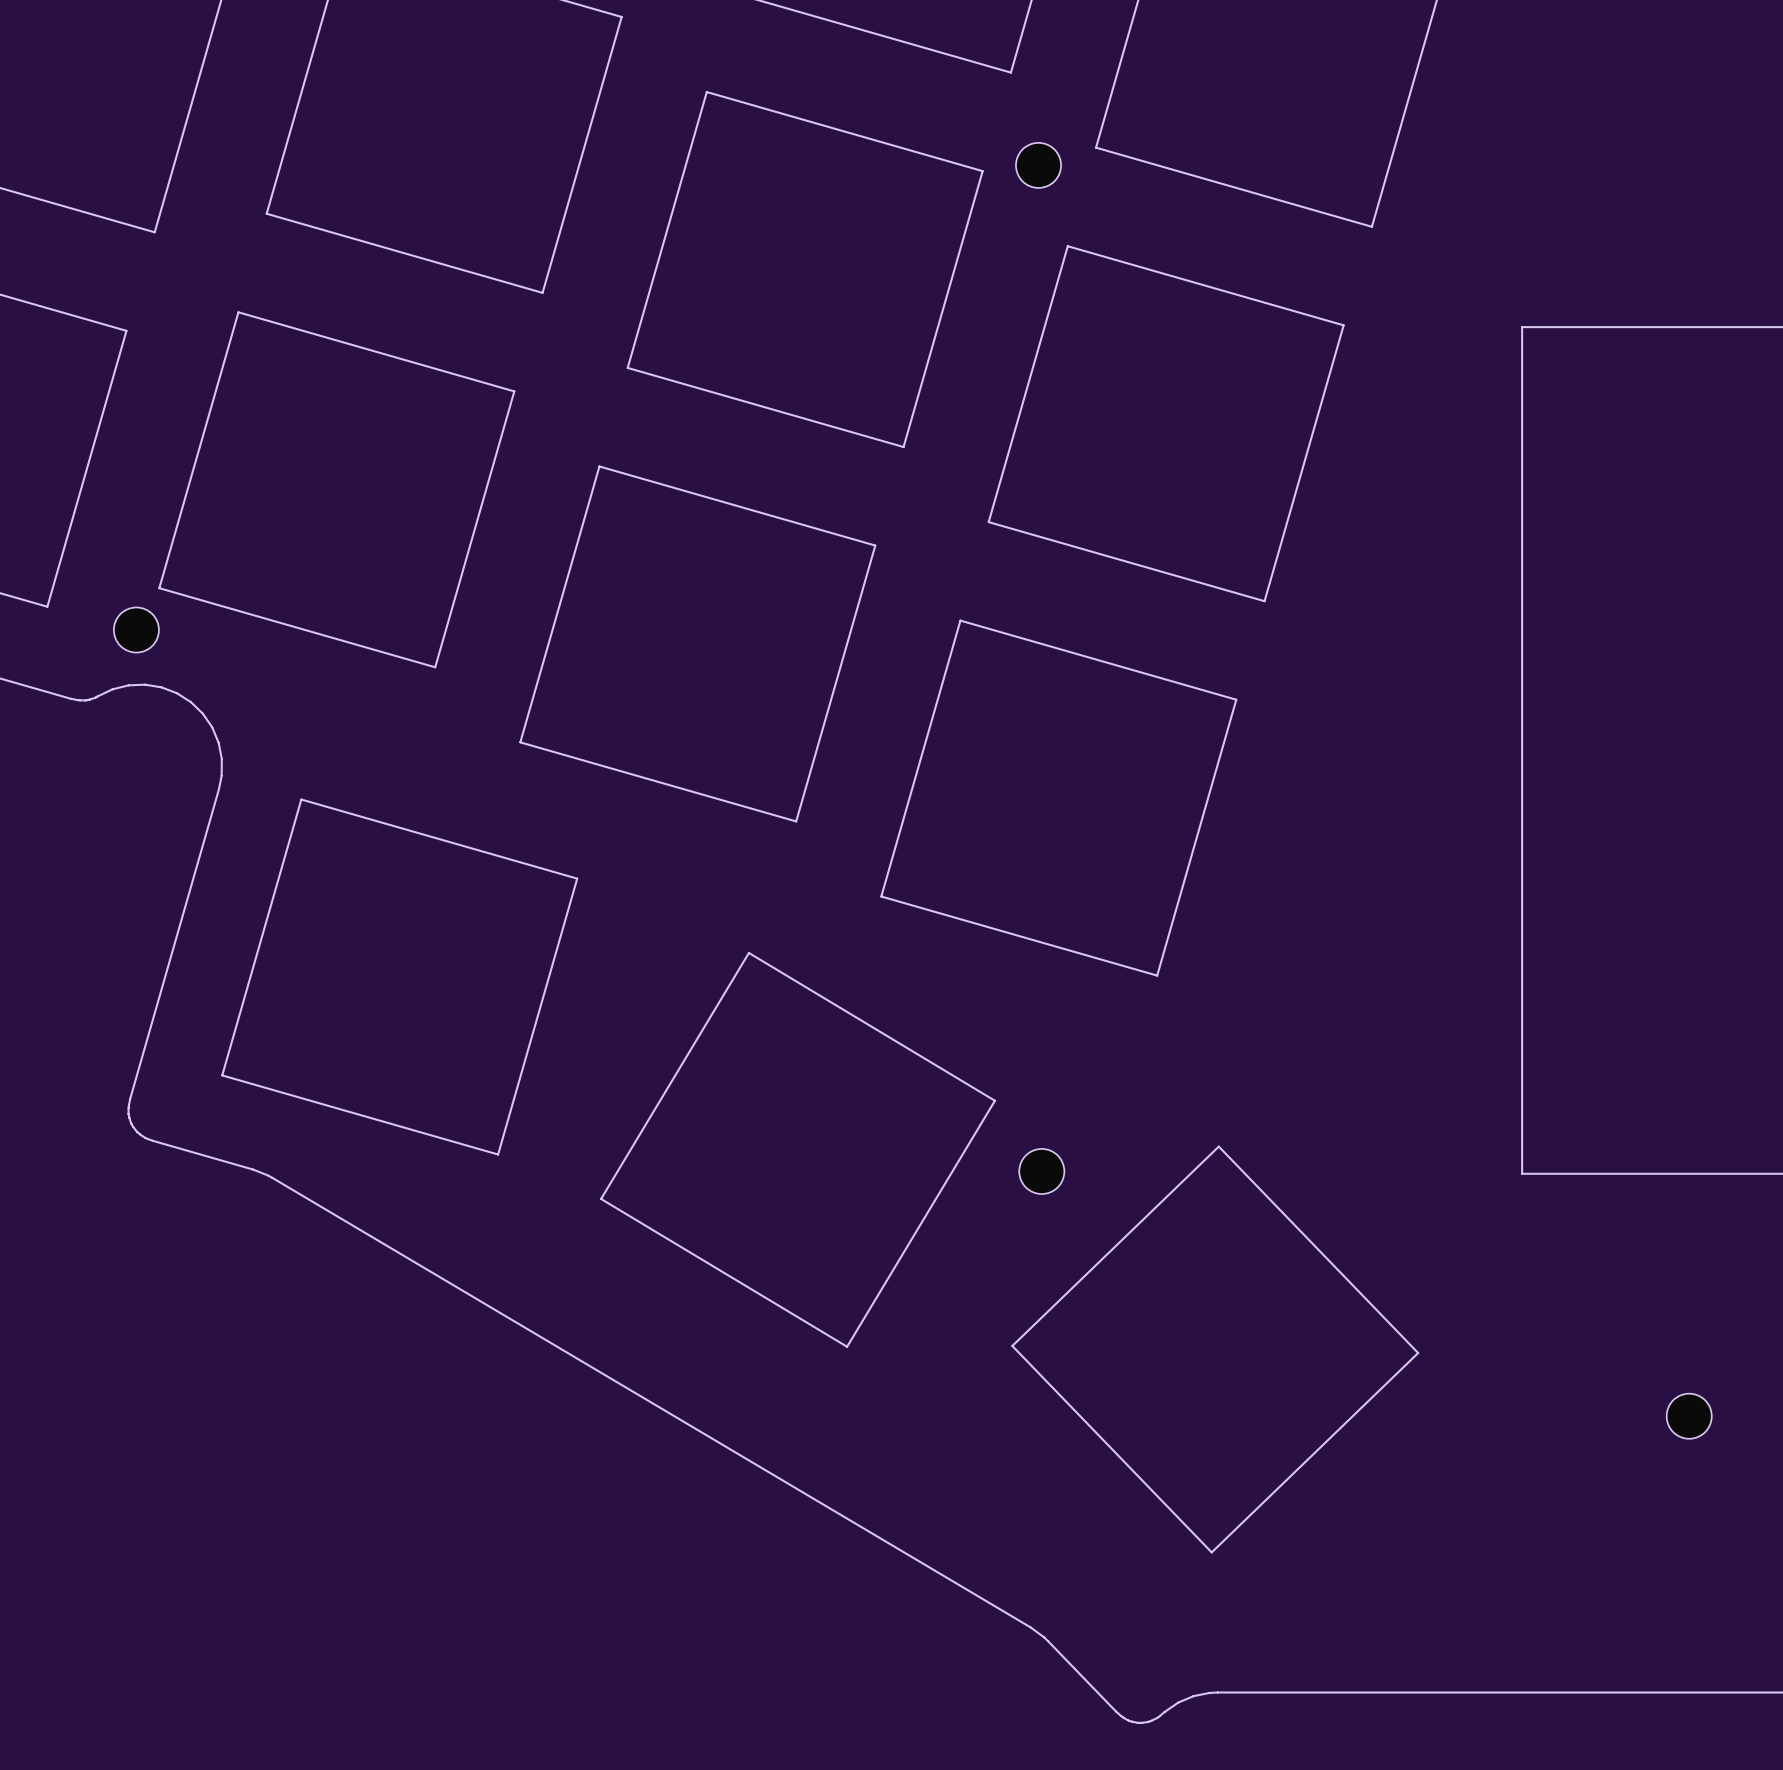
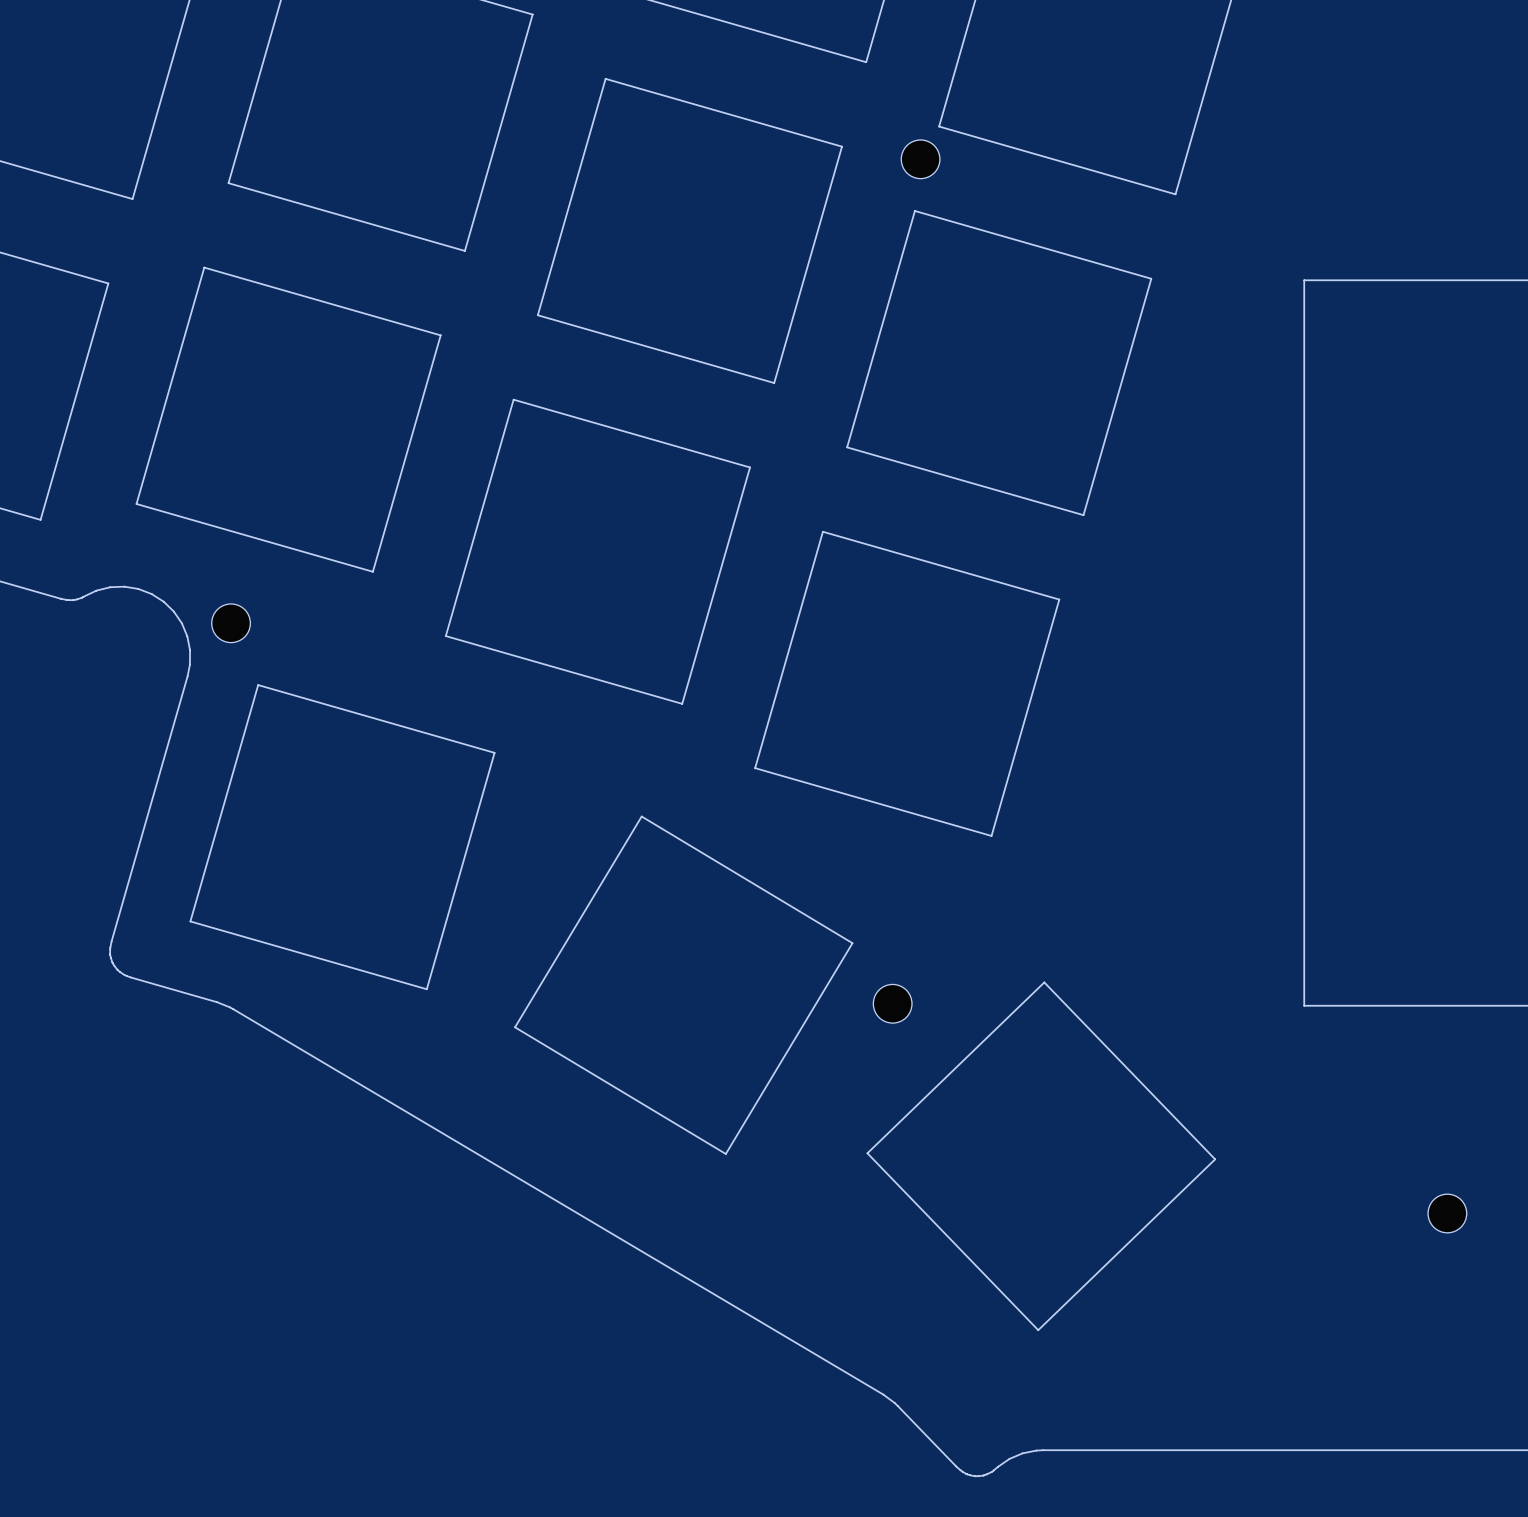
part position: (1038, 165) -> (920, 159)
part position: (136, 630) -> (231, 623)

